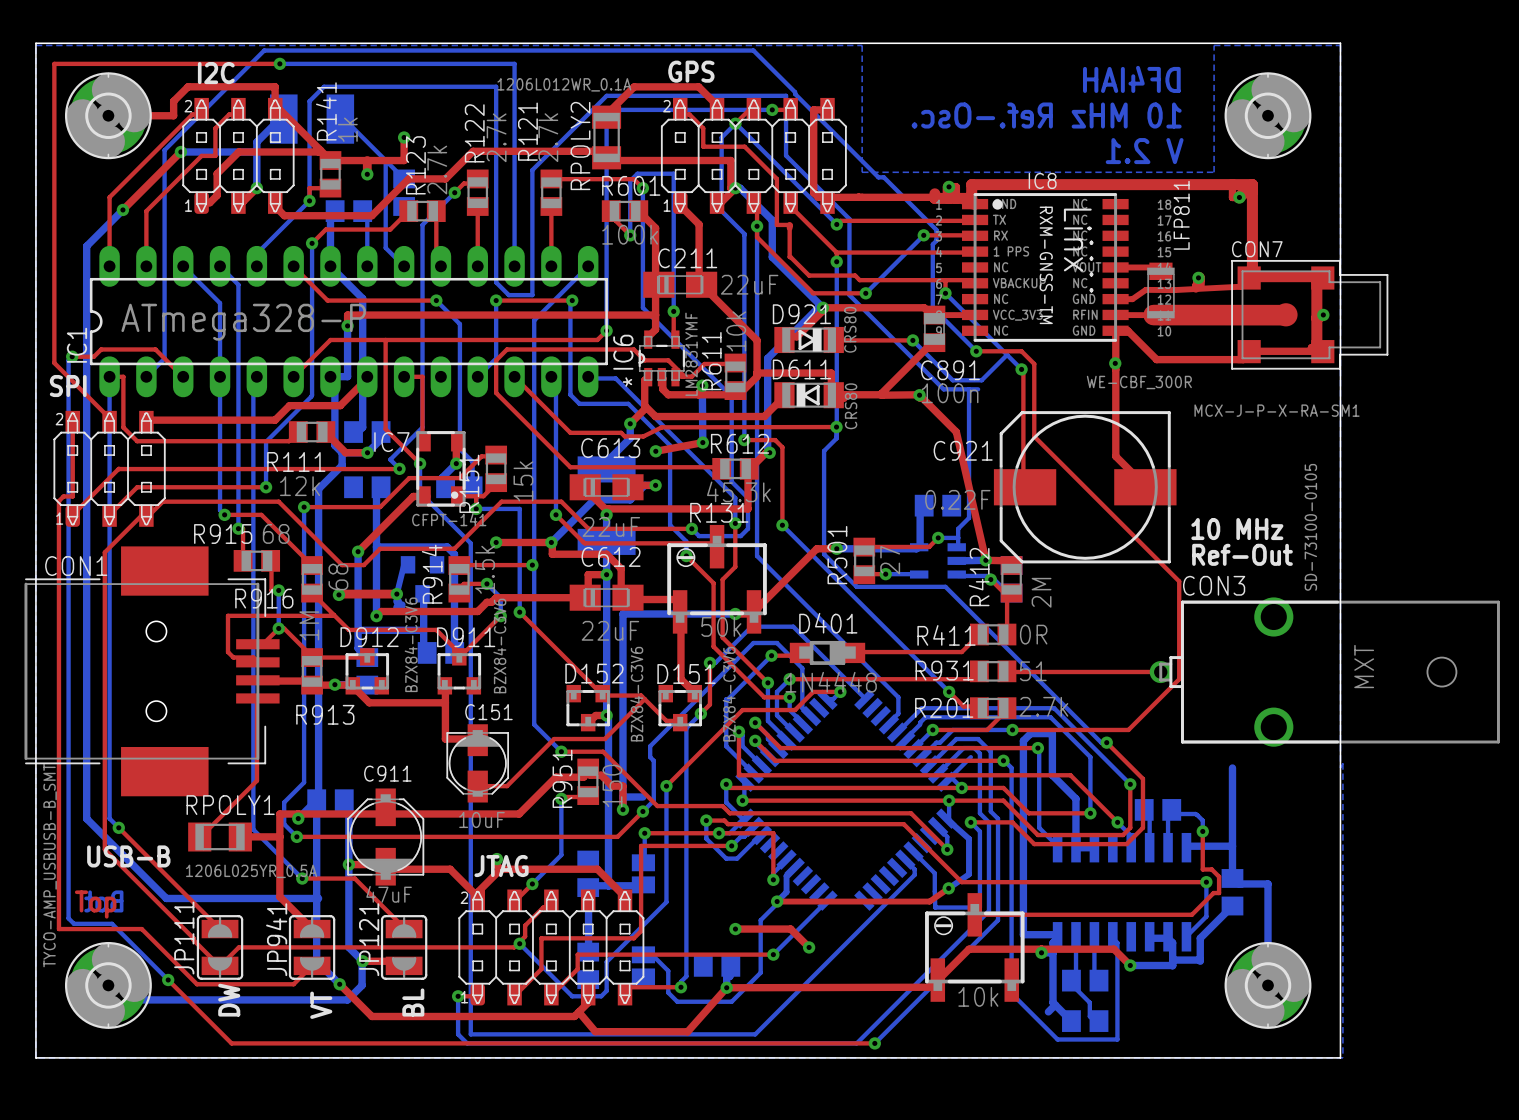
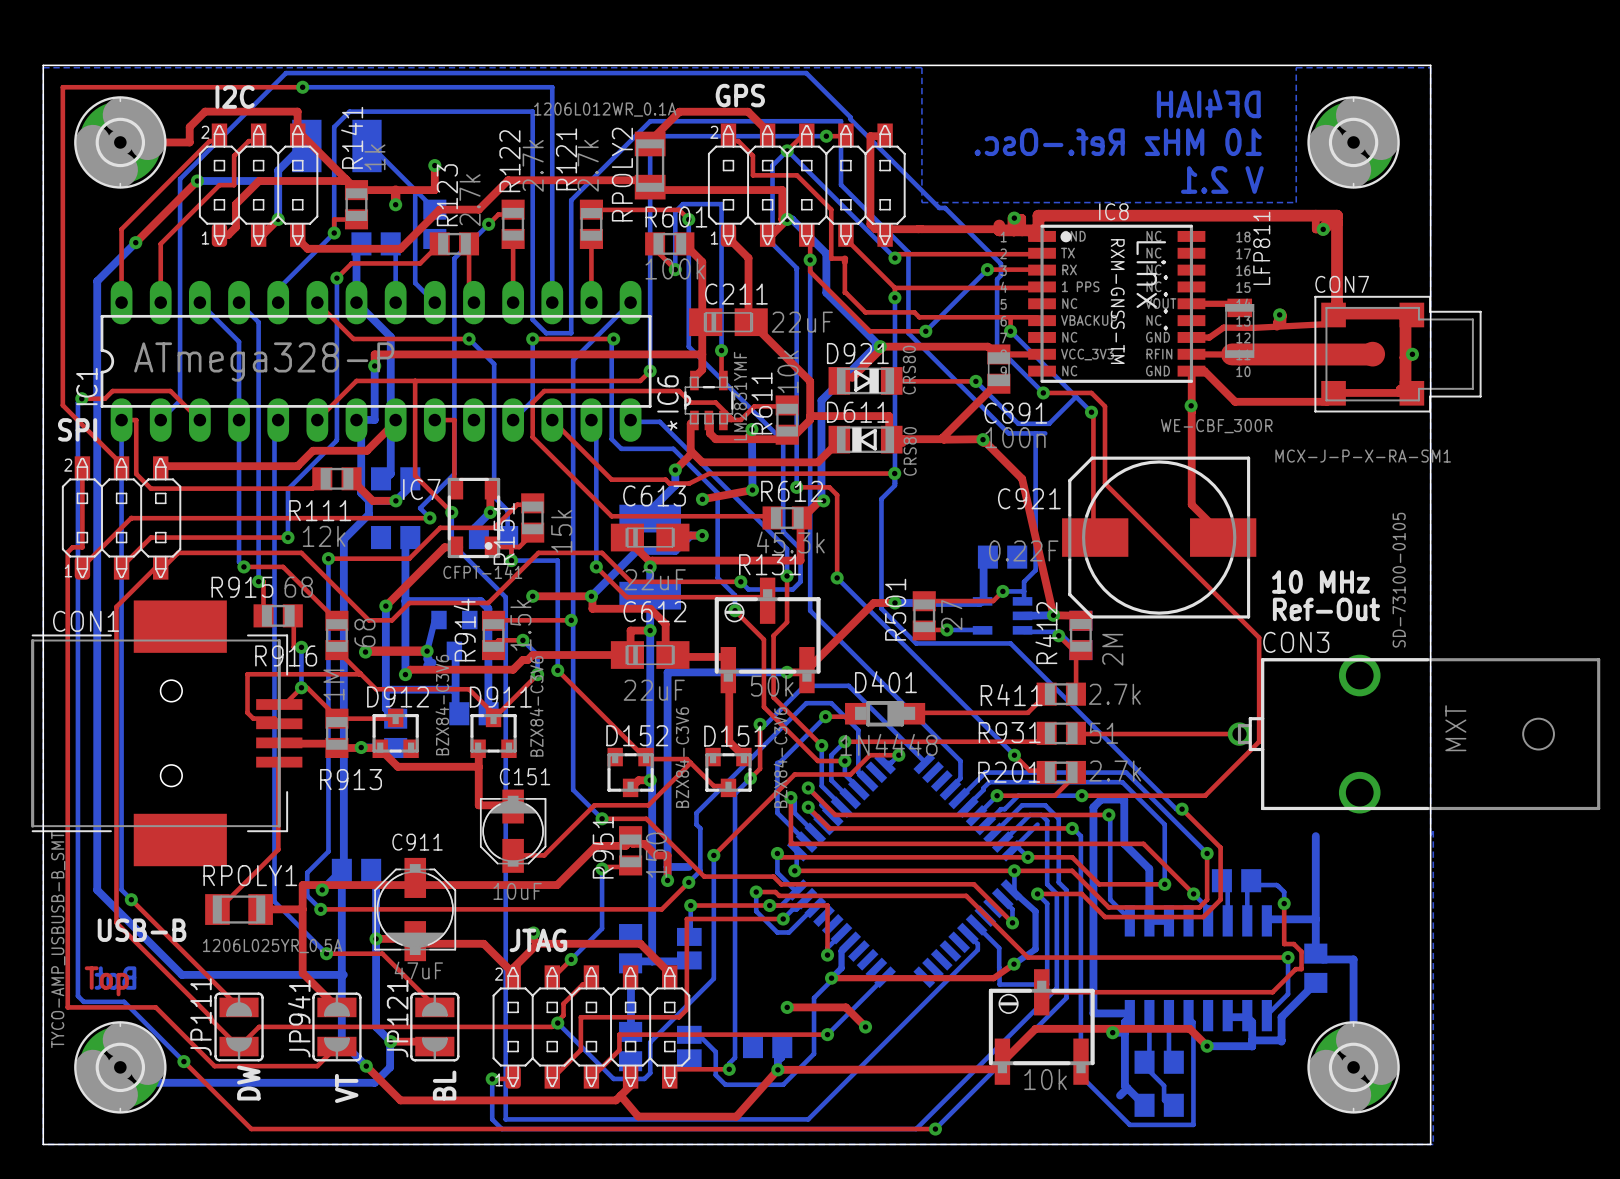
R411 value: 0R (1033, 634) -> 2.7k (1114, 694)

